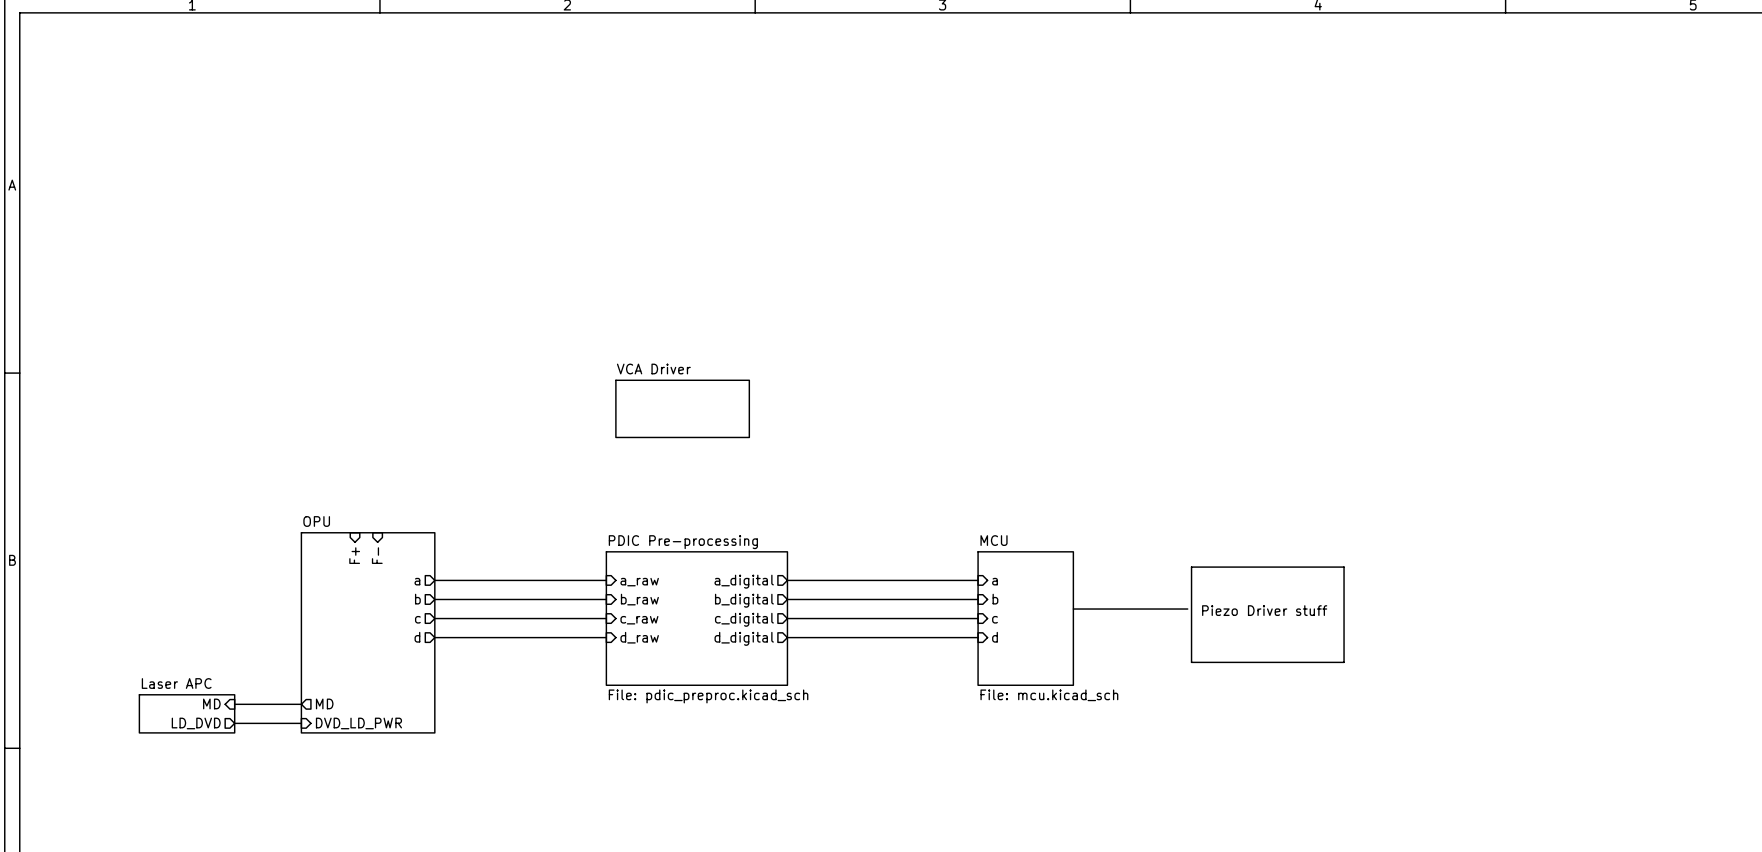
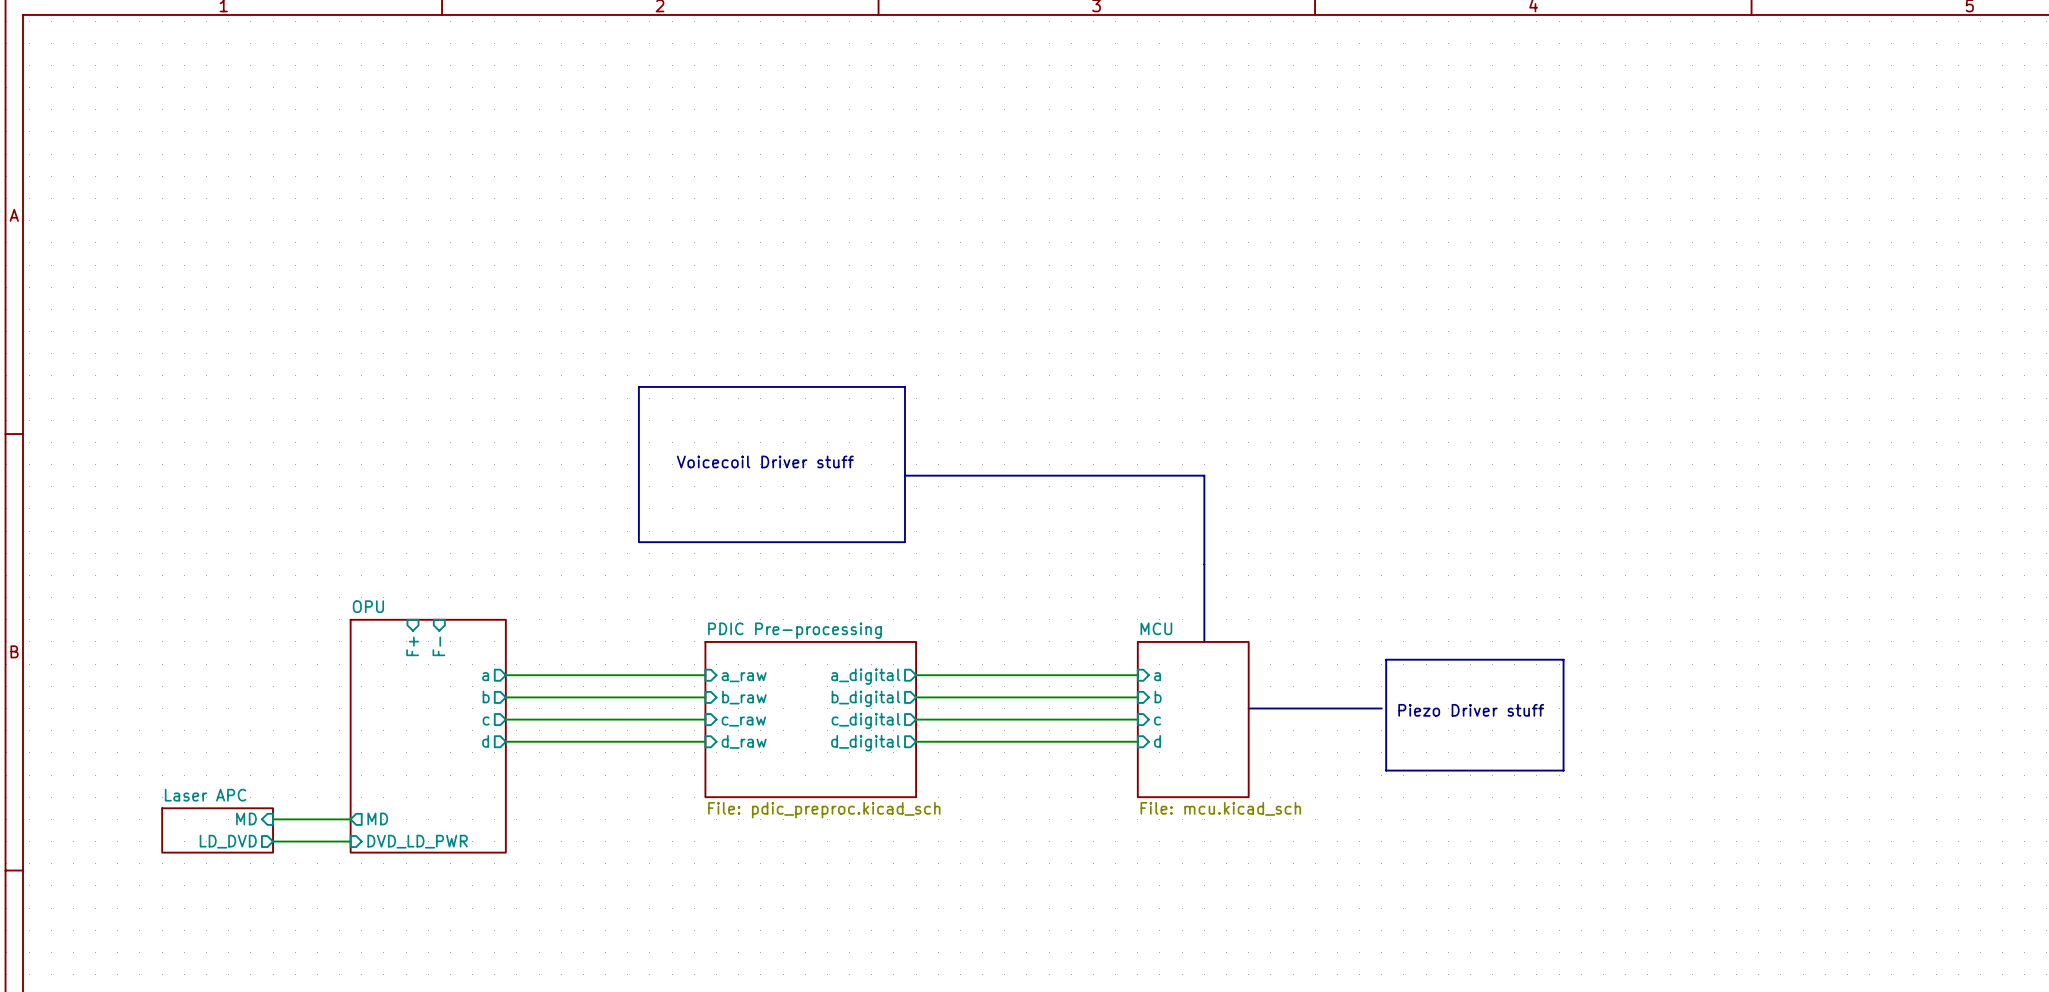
line: none -> (638, 386) (904, 386) (904, 542) (638, 542) (638, 386)
text: none -> Voicecoil Driver stuff (765, 461)
sheet VCA Driver: (682, 408) -> none
line: none -> (904, 475) (1204, 475) (1204, 641)

